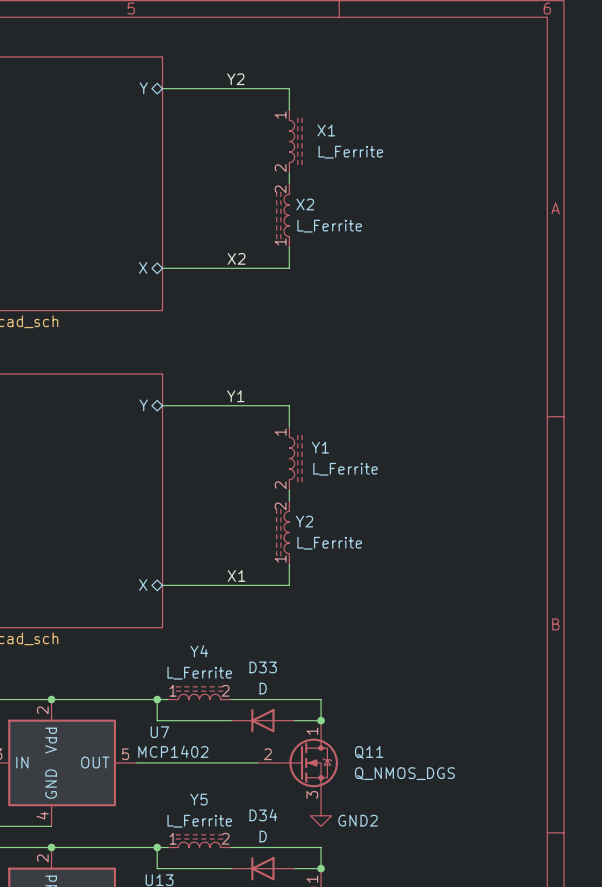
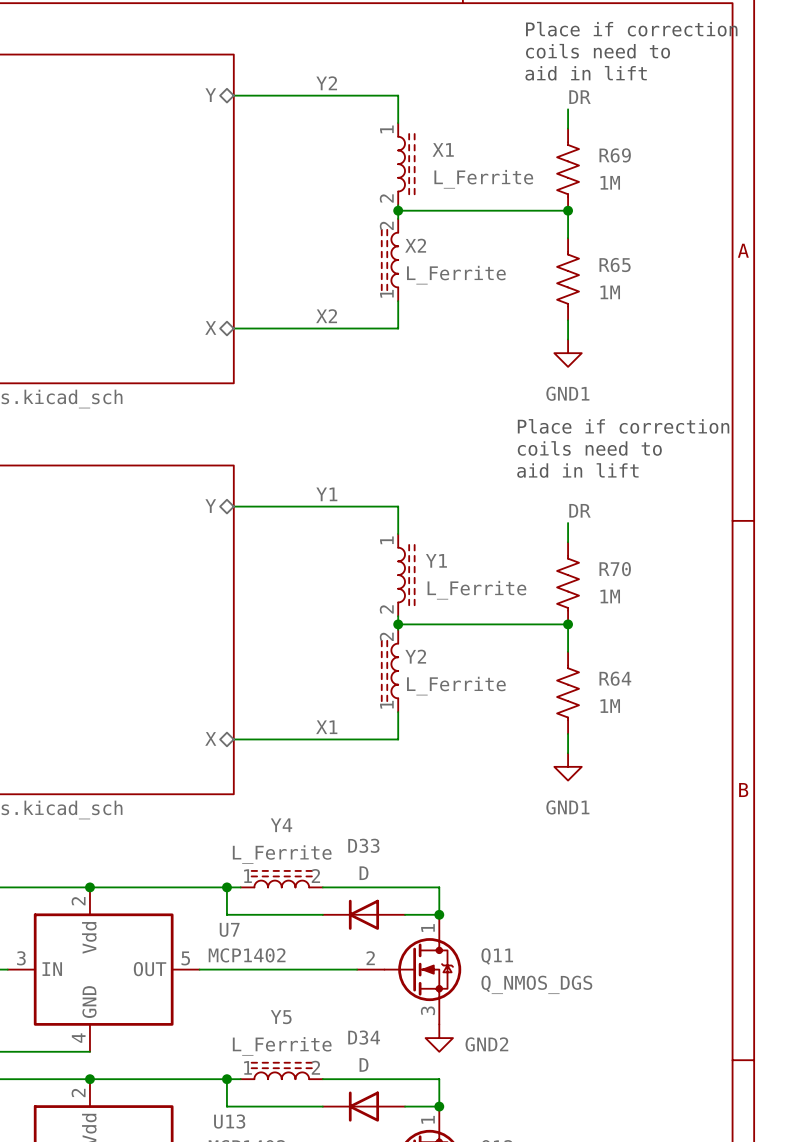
text: none -> Place if correction (631, 29)
text: none -> coils need to (598, 51)
text: none -> aid in lift (586, 73)
label: none -> DR (579, 97)
wire: none -> (568, 109) (568, 128)
R69: none -> 1M (568, 169)
wire: none -> (398, 210) (568, 210) (568, 238)
junction: none -> (398, 210)
junction: none -> (568, 210)
R65: none -> 1M (568, 279)
wire: none -> (568, 320) (568, 339)
power symbol: none -> GND1 (568, 353)
text: none -> Place if correction (623, 426)
text: none -> coils need to (589, 448)
text: none -> aid in lift (577, 470)
label: none -> DR (579, 510)
wire: none -> (568, 523) (568, 542)
R70: none -> 1M (568, 583)
wire: none -> (398, 624) (568, 624) (568, 651)
junction: none -> (398, 624)
junction: none -> (568, 624)
R64: none -> 1M (568, 692)
wire: none -> (568, 733) (568, 753)
power symbol: none -> GND1 (568, 766)

